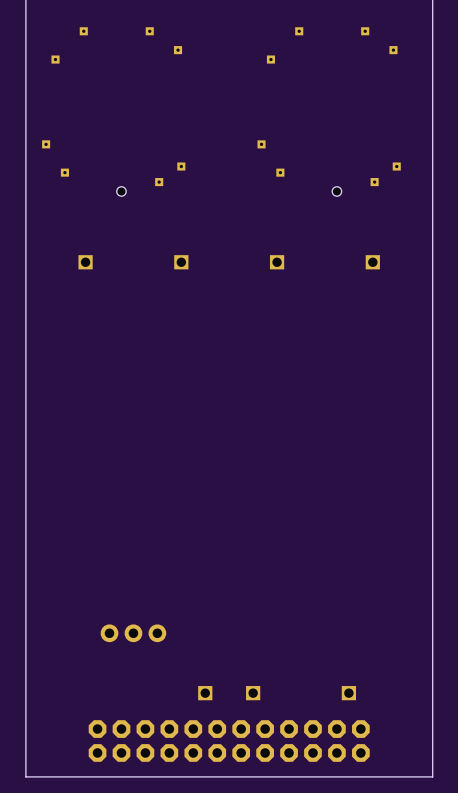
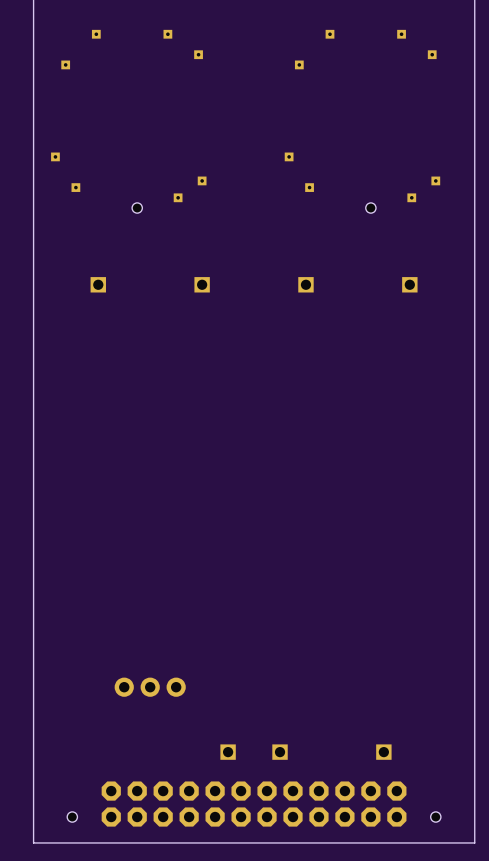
hole: none -> (72, 817)
hole: none -> (435, 817)

